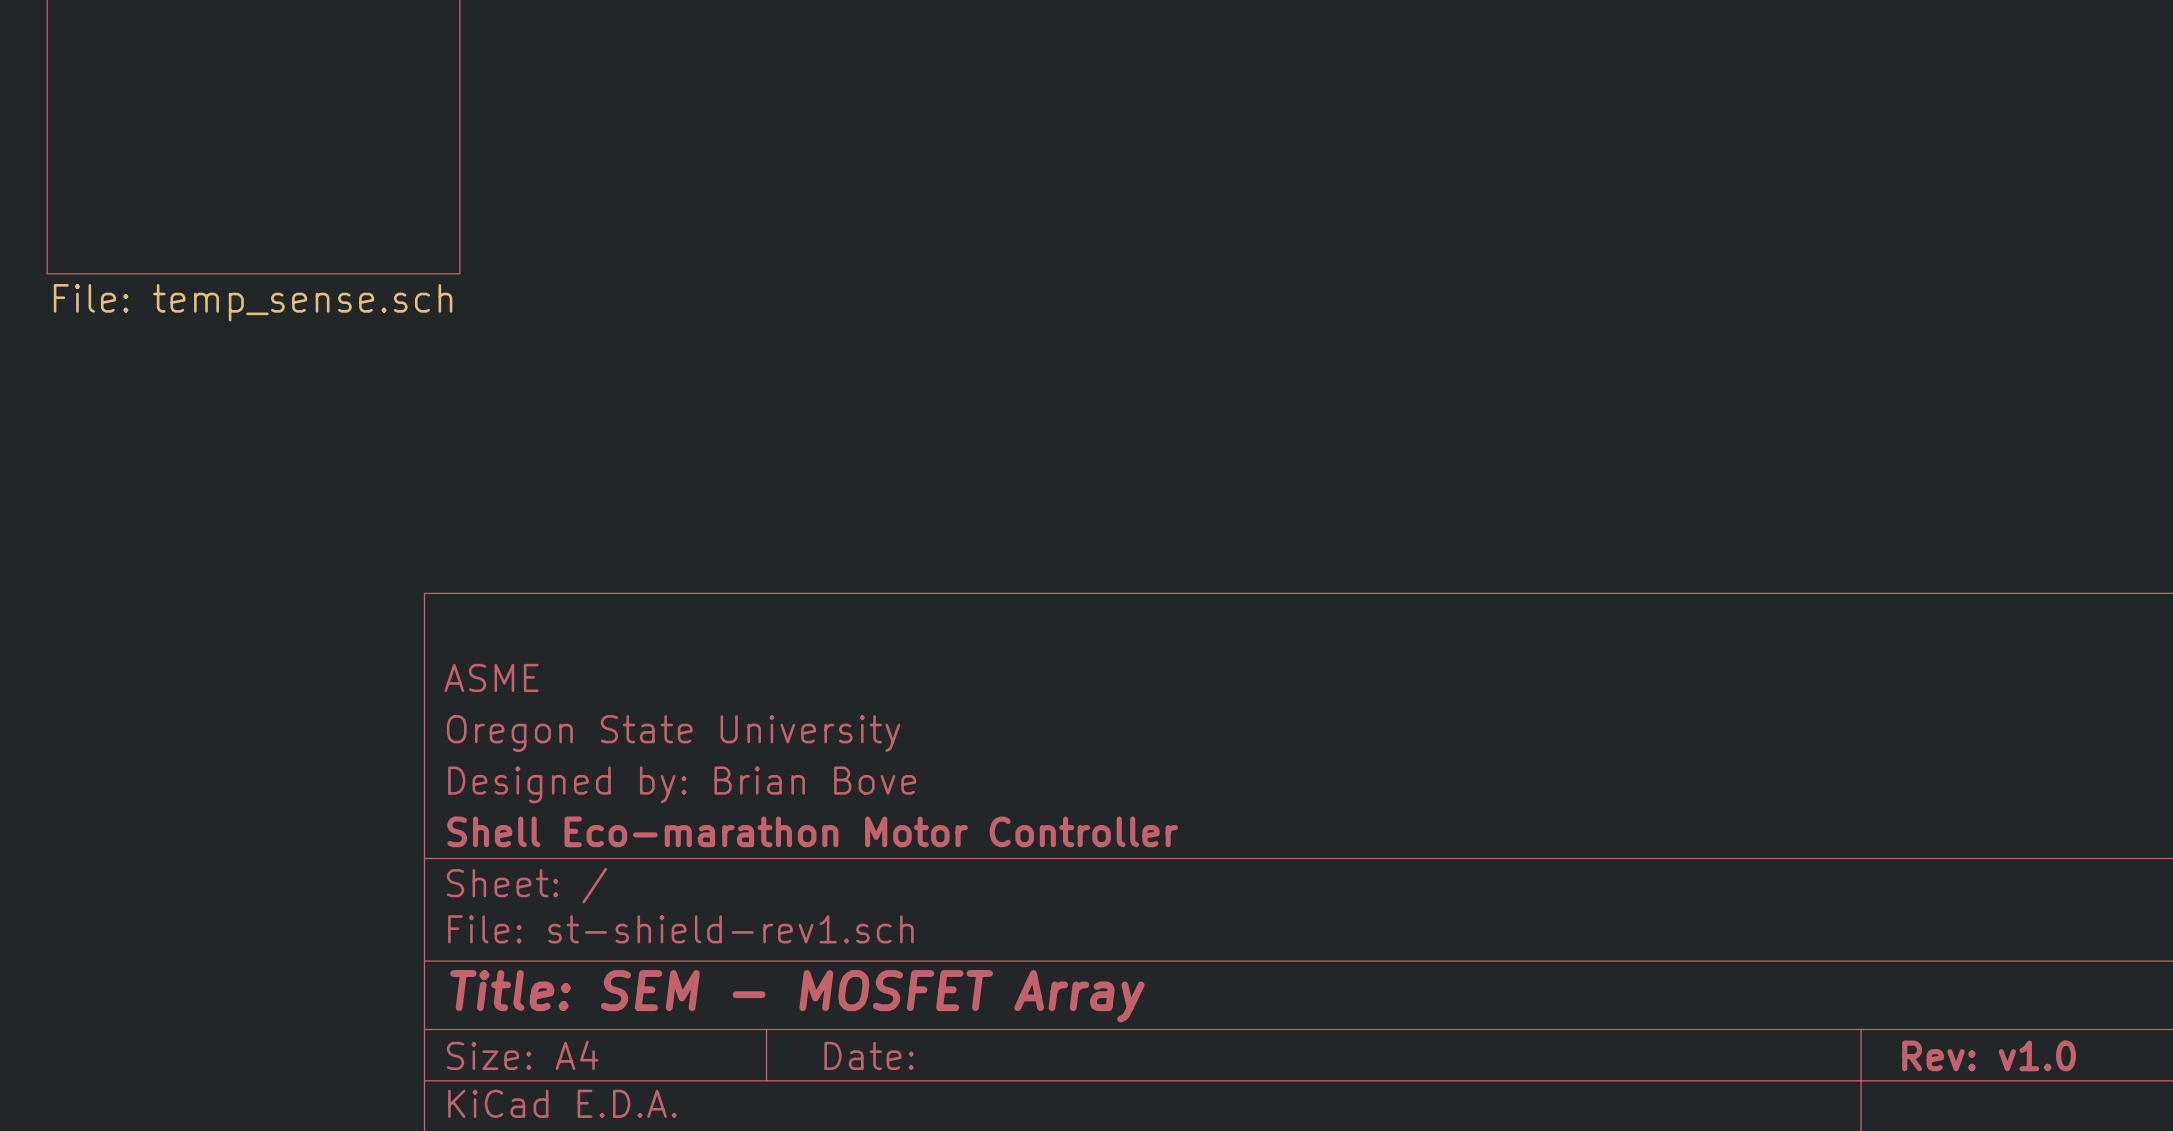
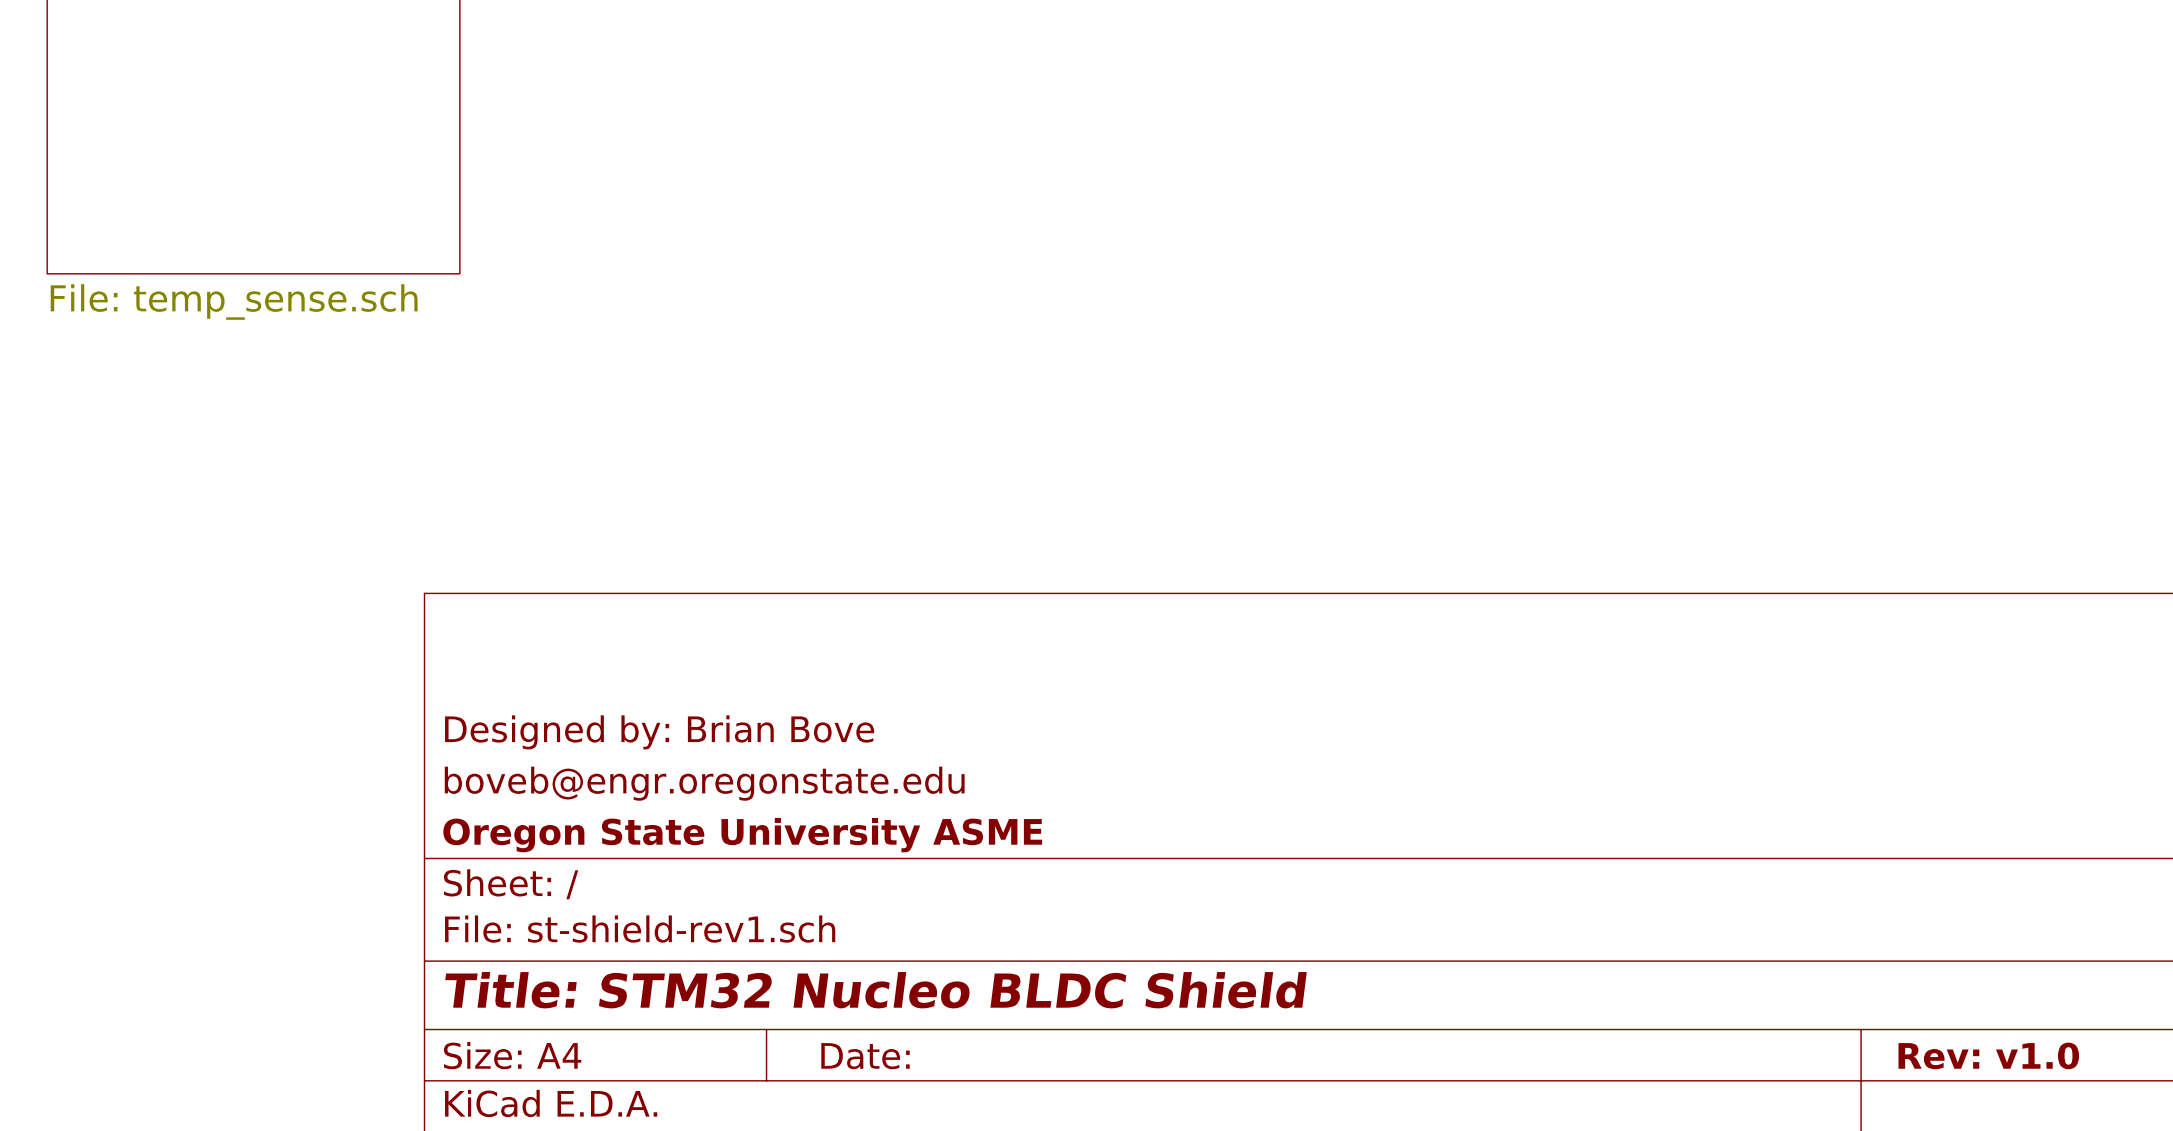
title block: ASME (491, 677) -> none
title block: Oregon State University (673, 733) -> Designed by: Brian Bove (659, 732)
title block: Designed by: Brian Bove (682, 784) -> boveb@engr.oregonstate.edu (704, 783)
title block: Shell Eco-marathon Motor Controller (812, 831) -> Oregon State University ASME (742, 835)
title block: Title: SEM - MOSFET Array (797, 996) -> Title: STM32 Nucleo BLDC Shield (876, 990)

